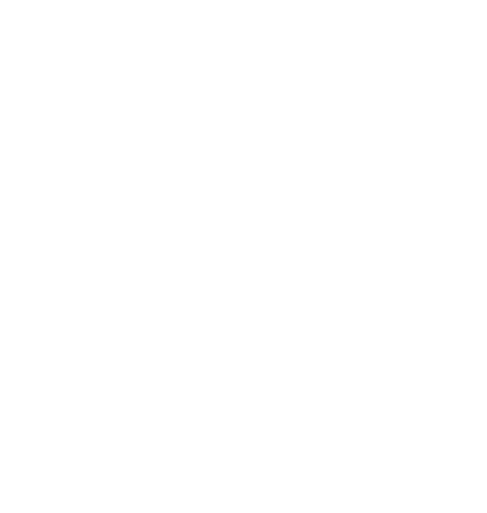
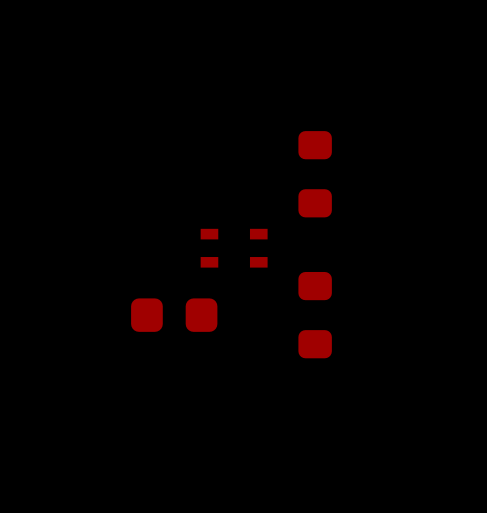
part: none -> (315, 174)
part: none -> (234, 248)
part: none -> (174, 315)
part: none -> (315, 315)

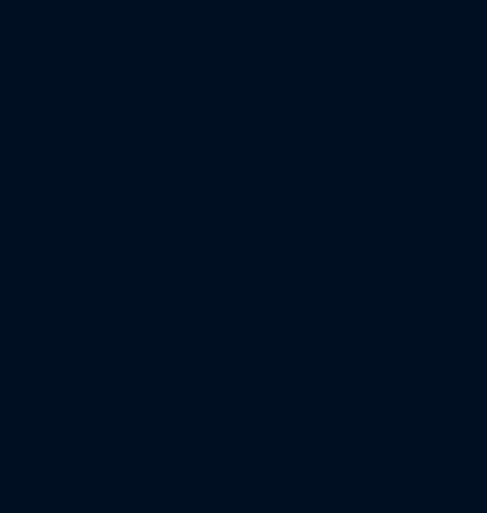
part: (315, 174) -> none
part: (234, 248) -> none
part: (174, 315) -> none
part: (315, 315) -> none

